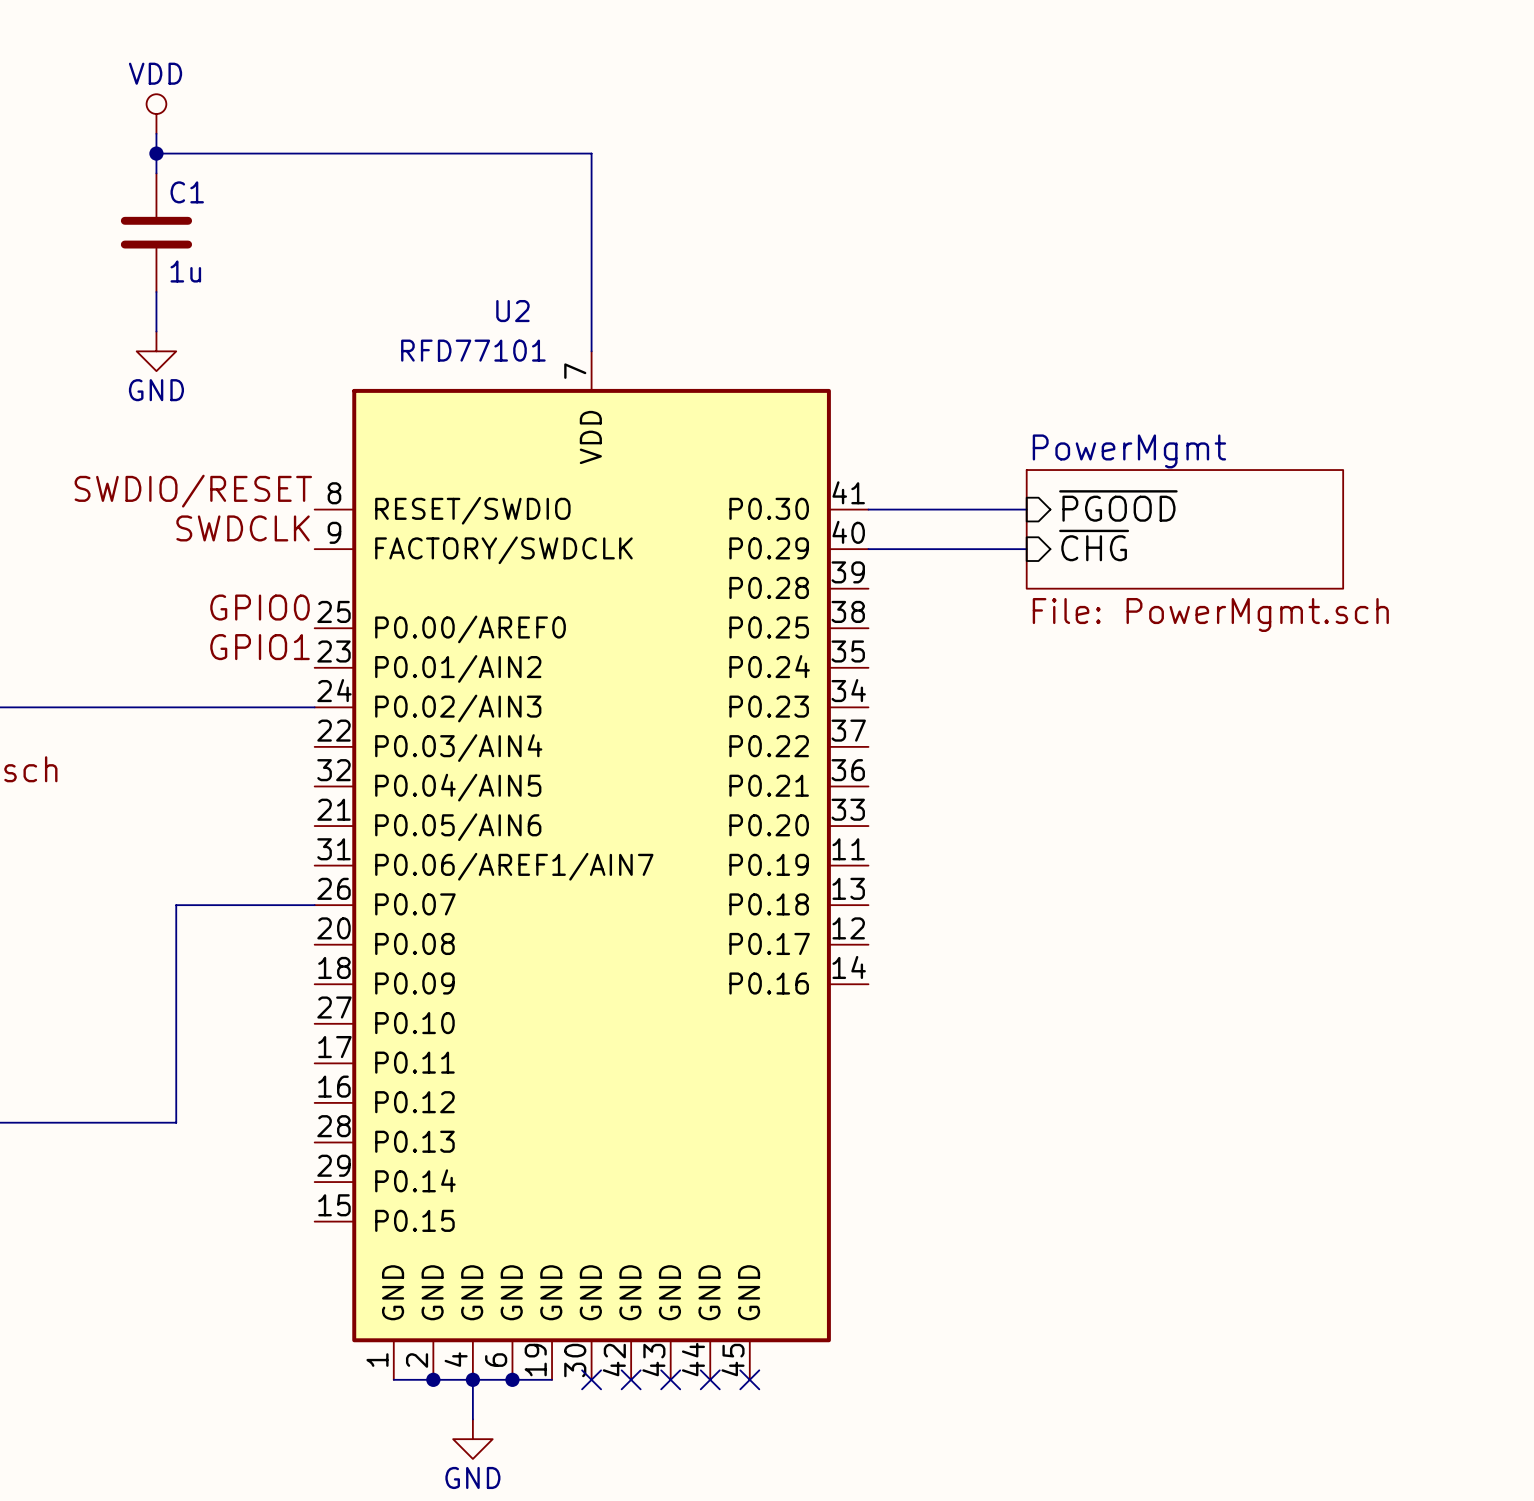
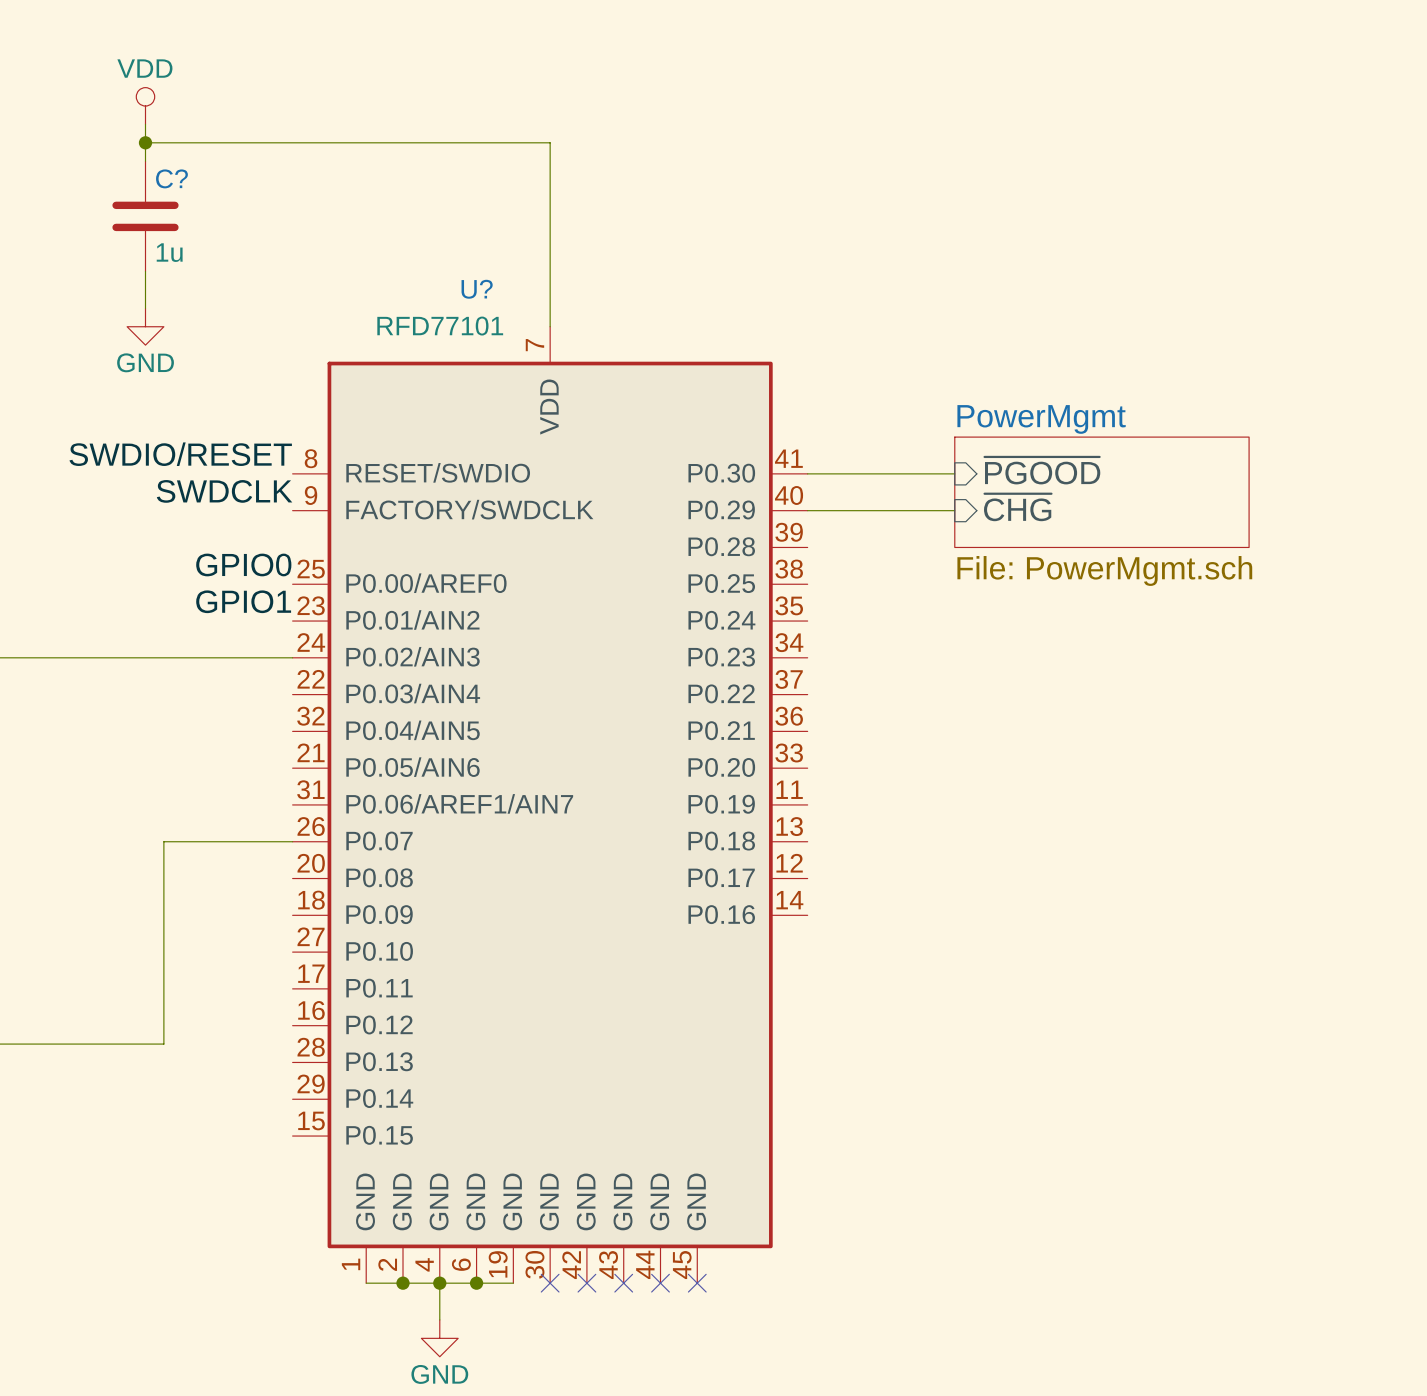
C1 name: C1 (187, 192) -> C? (171, 178)
U2 name: U2 (512, 311) -> U? (477, 289)

